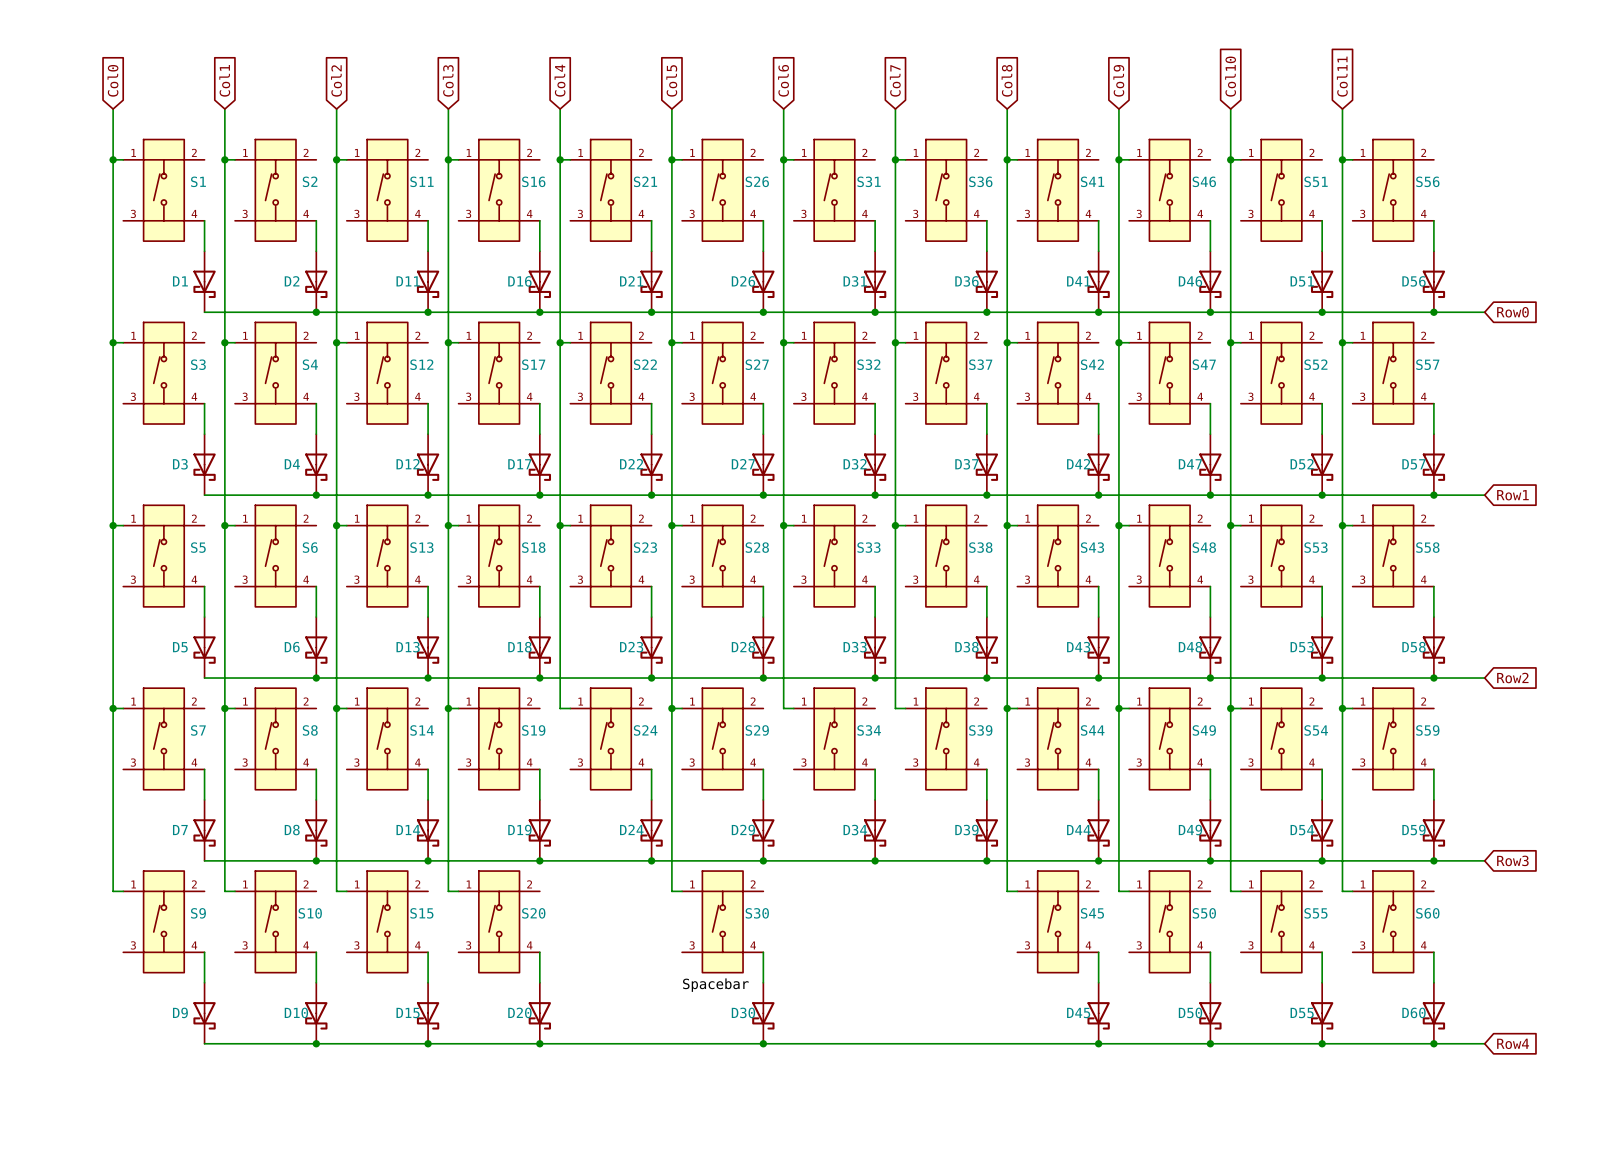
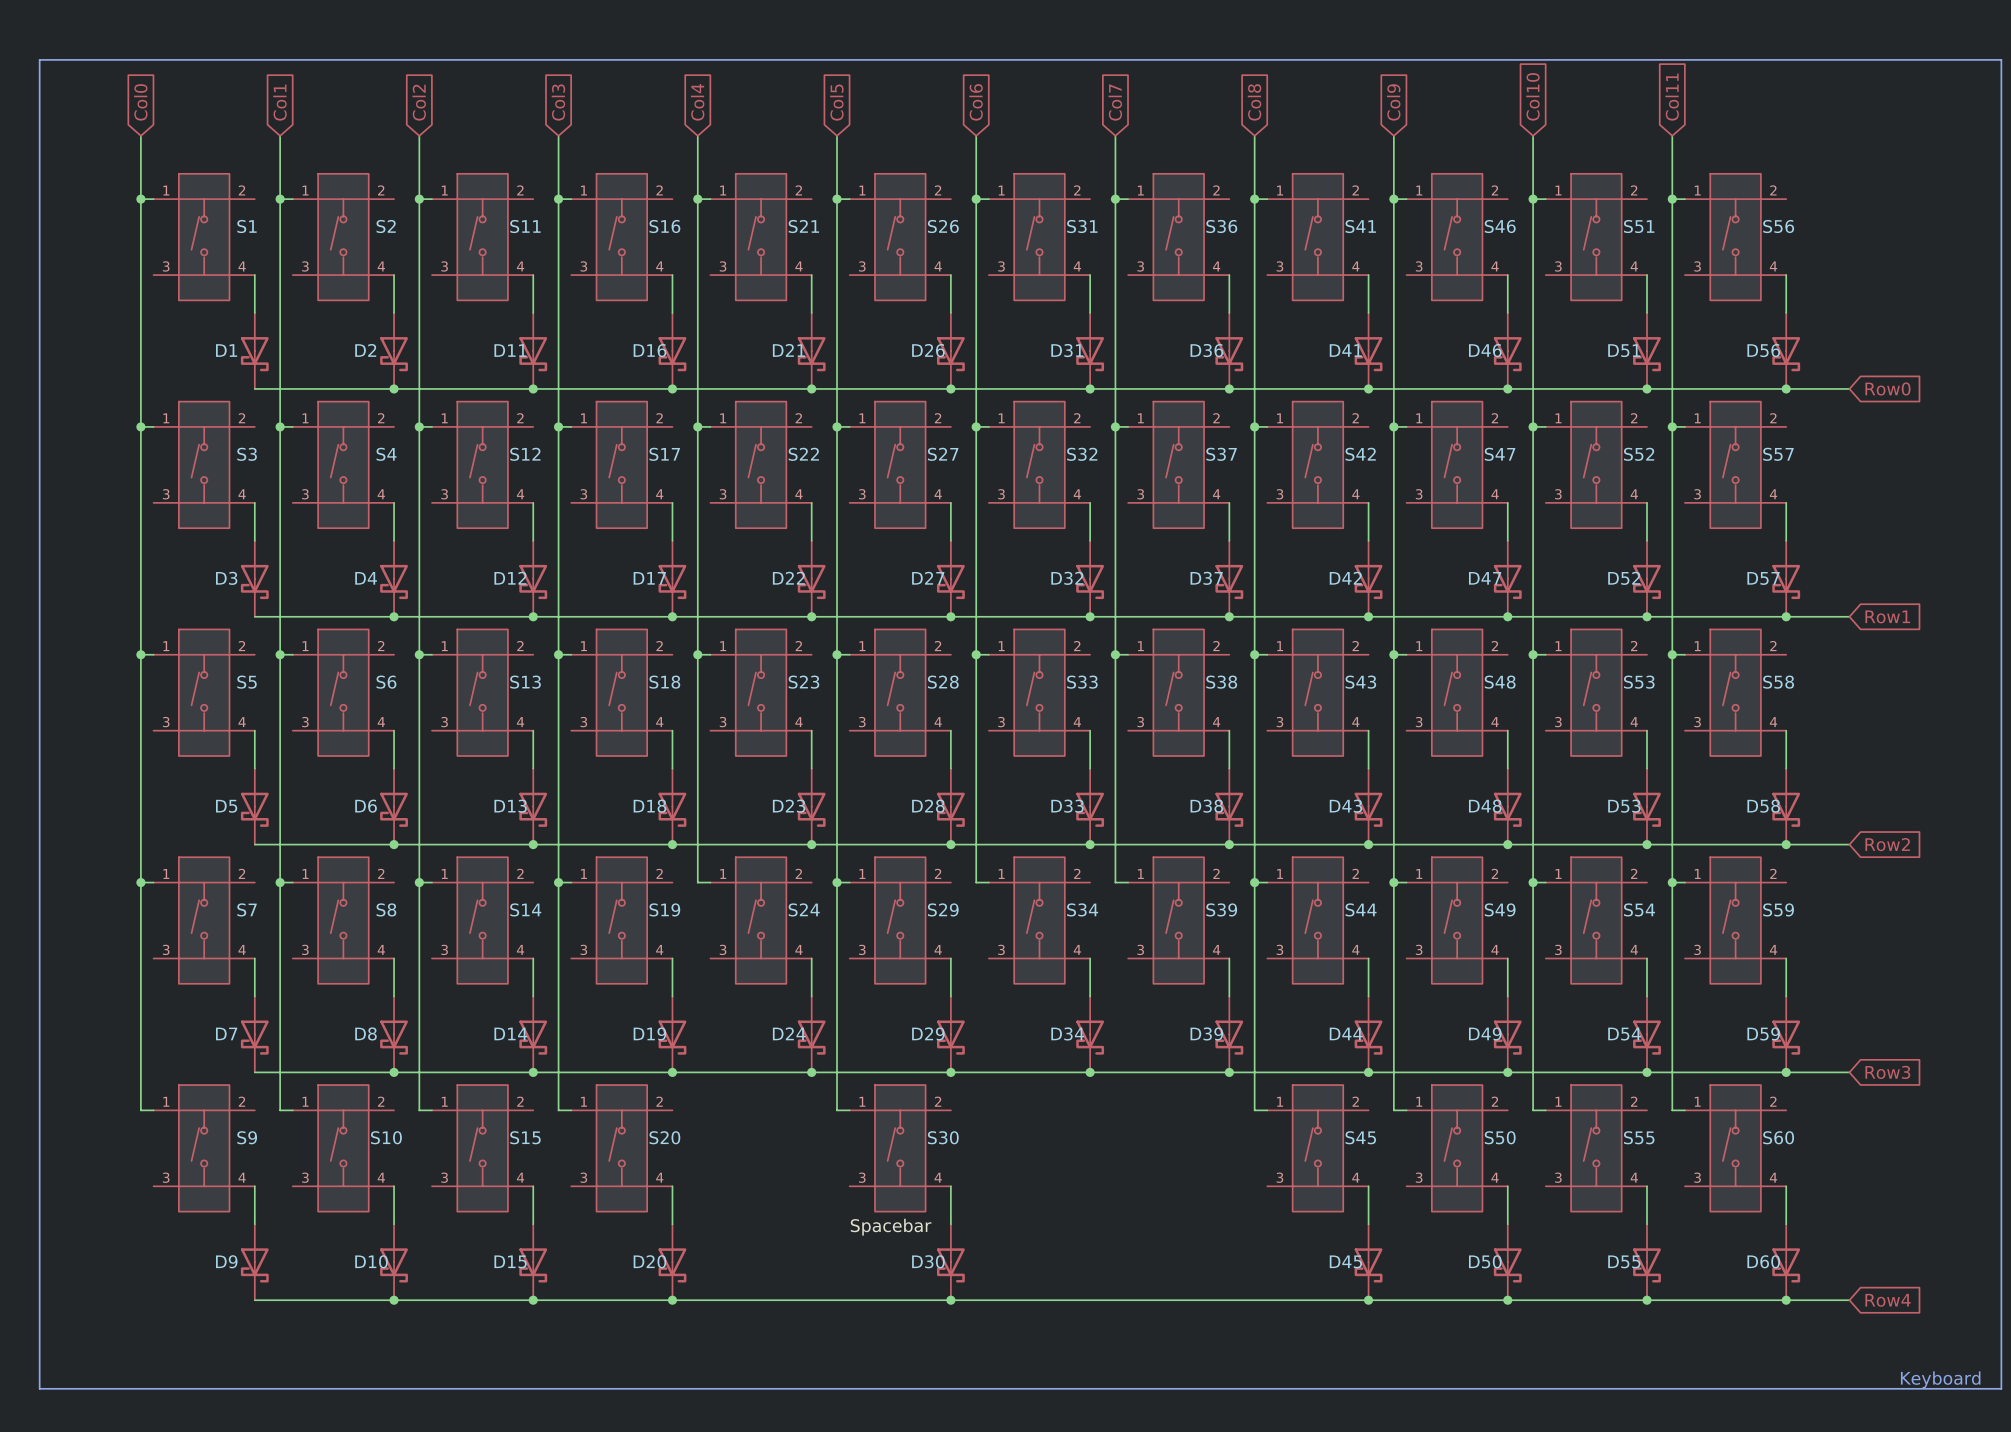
line: none -> (39, 59) (2001, 59) (2001, 1388) (39, 1388) (39, 59)
text: none -> Keyboard (1940, 1379)

